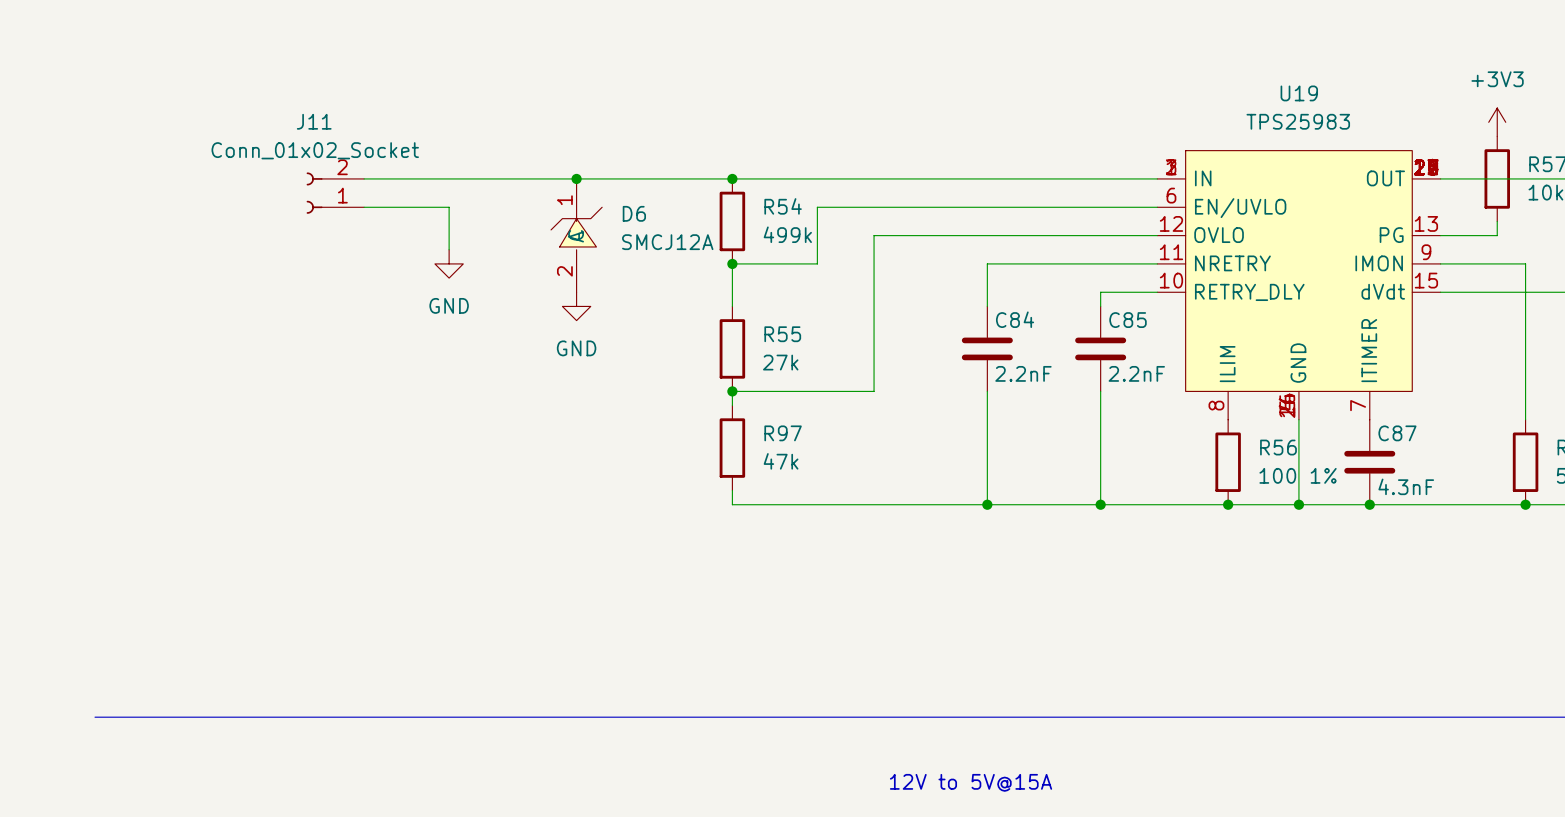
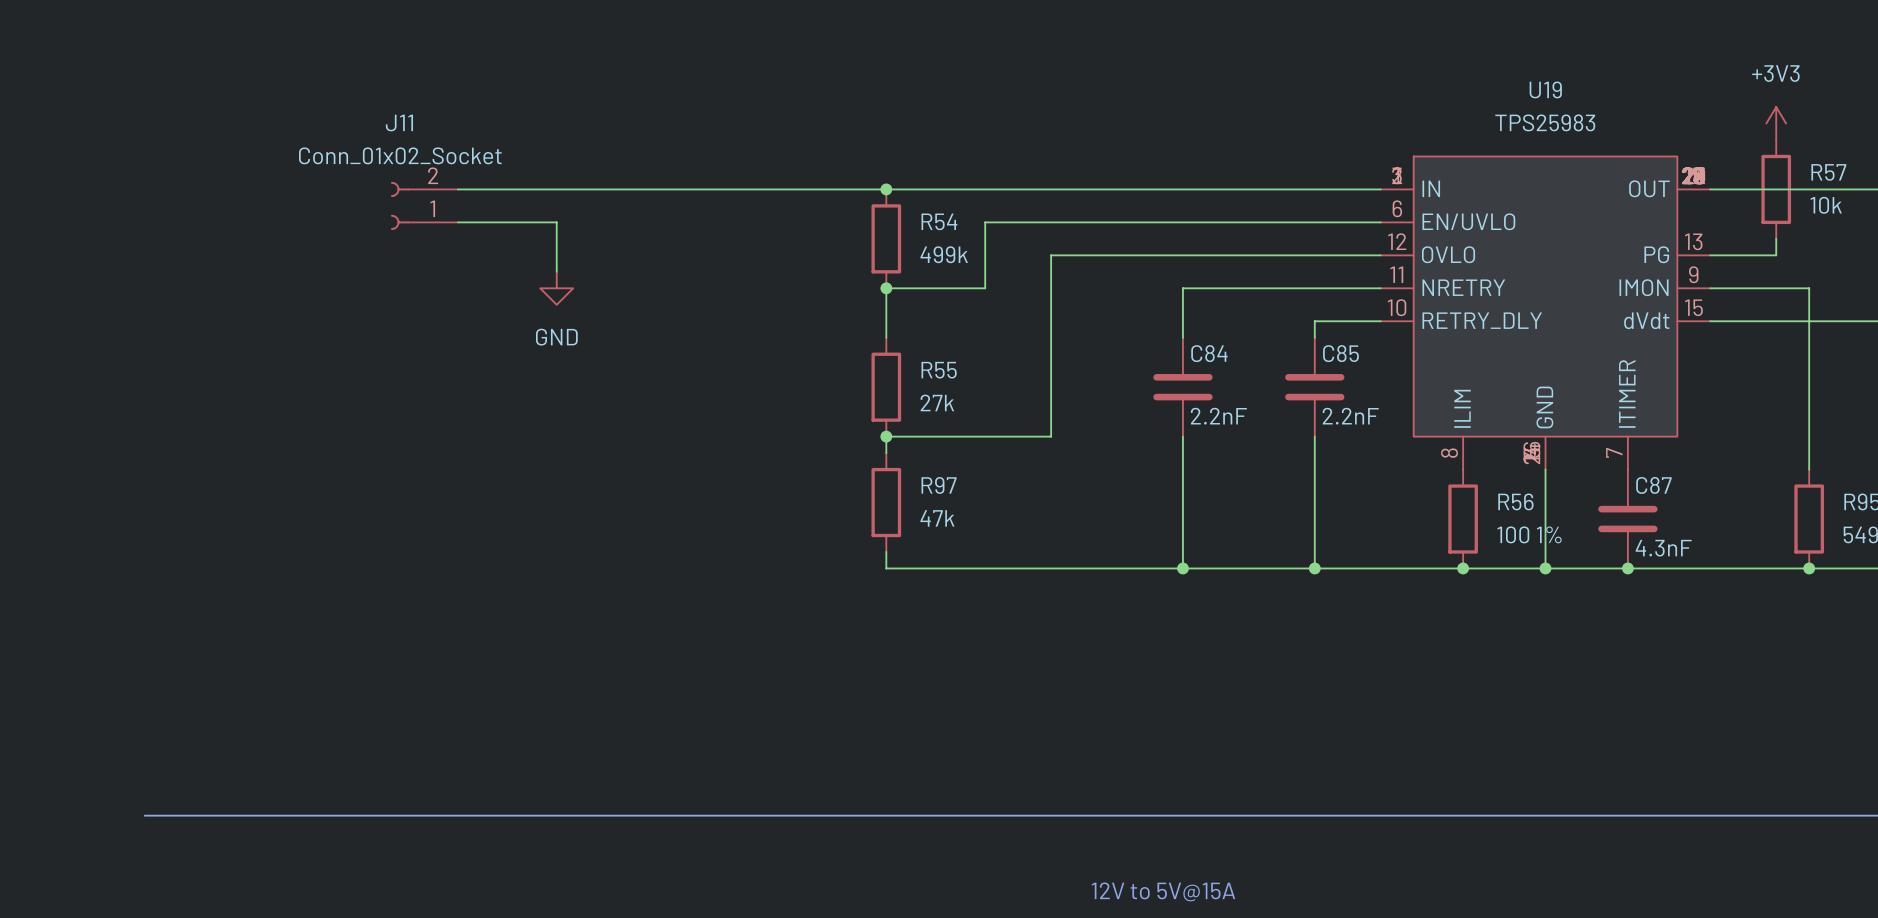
junction: (576, 178) -> none
D6: SMCJ12A (576, 235) -> none
power symbol: GND (576, 306) -> none

